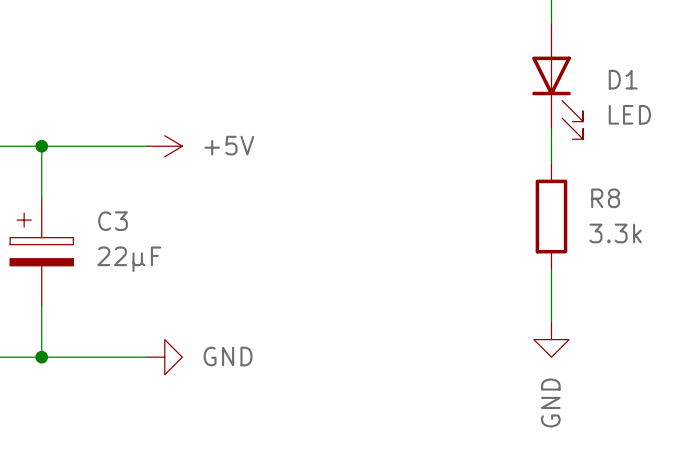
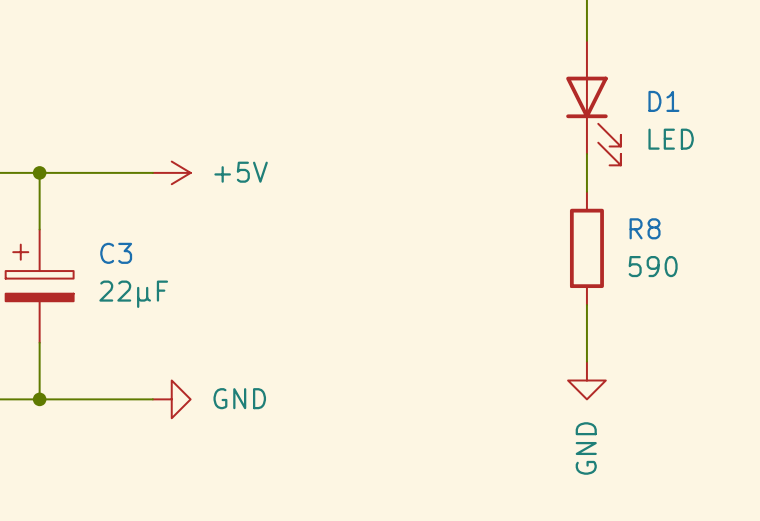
R8 value: 3.3k (615, 233) -> 590 (653, 266)

